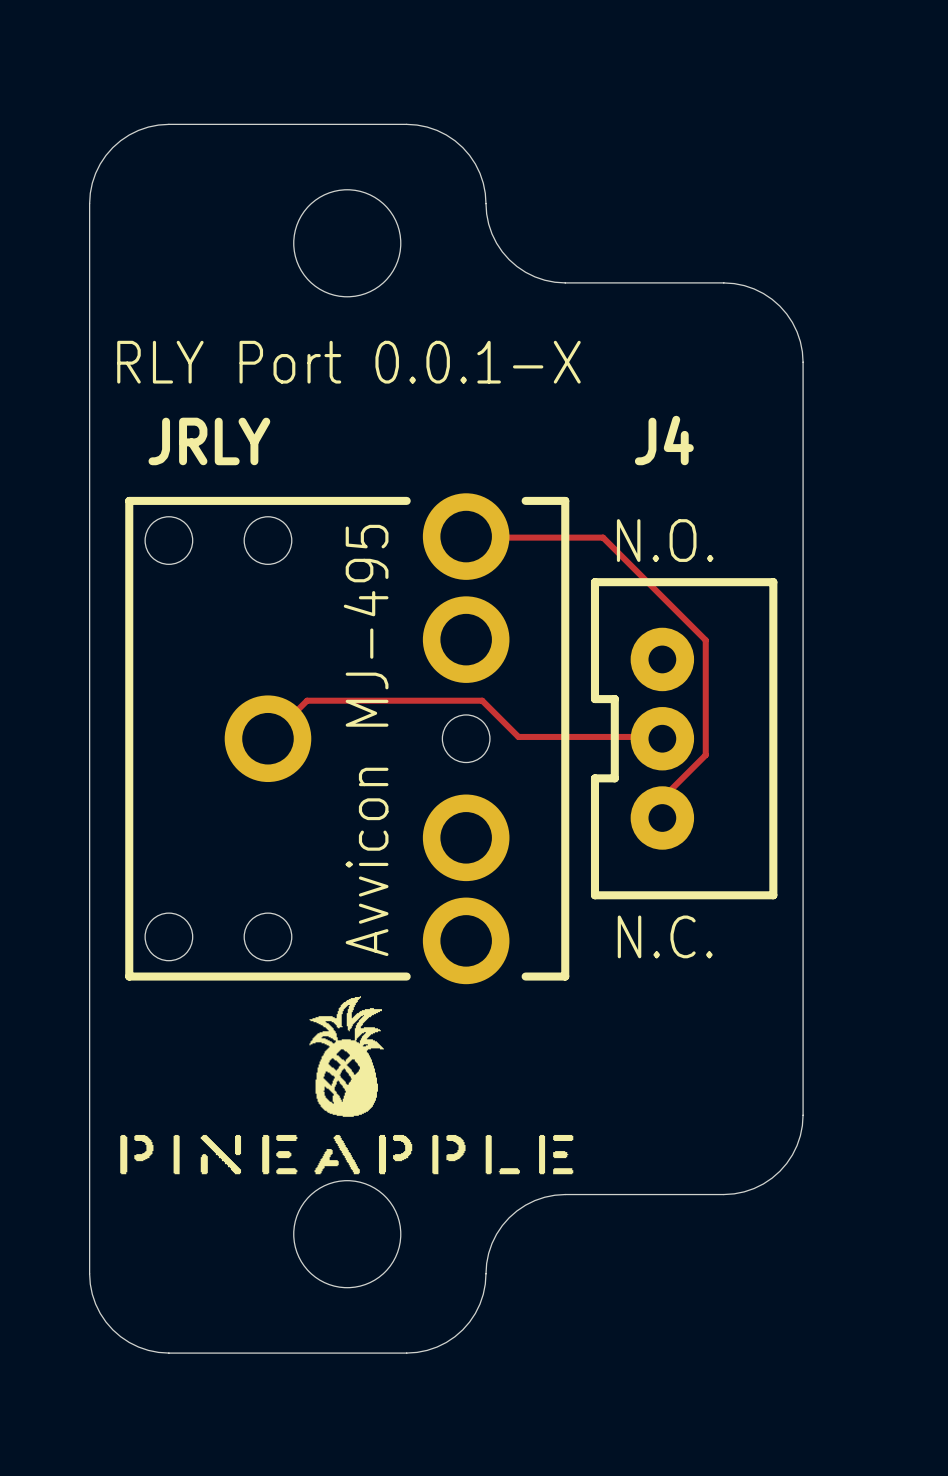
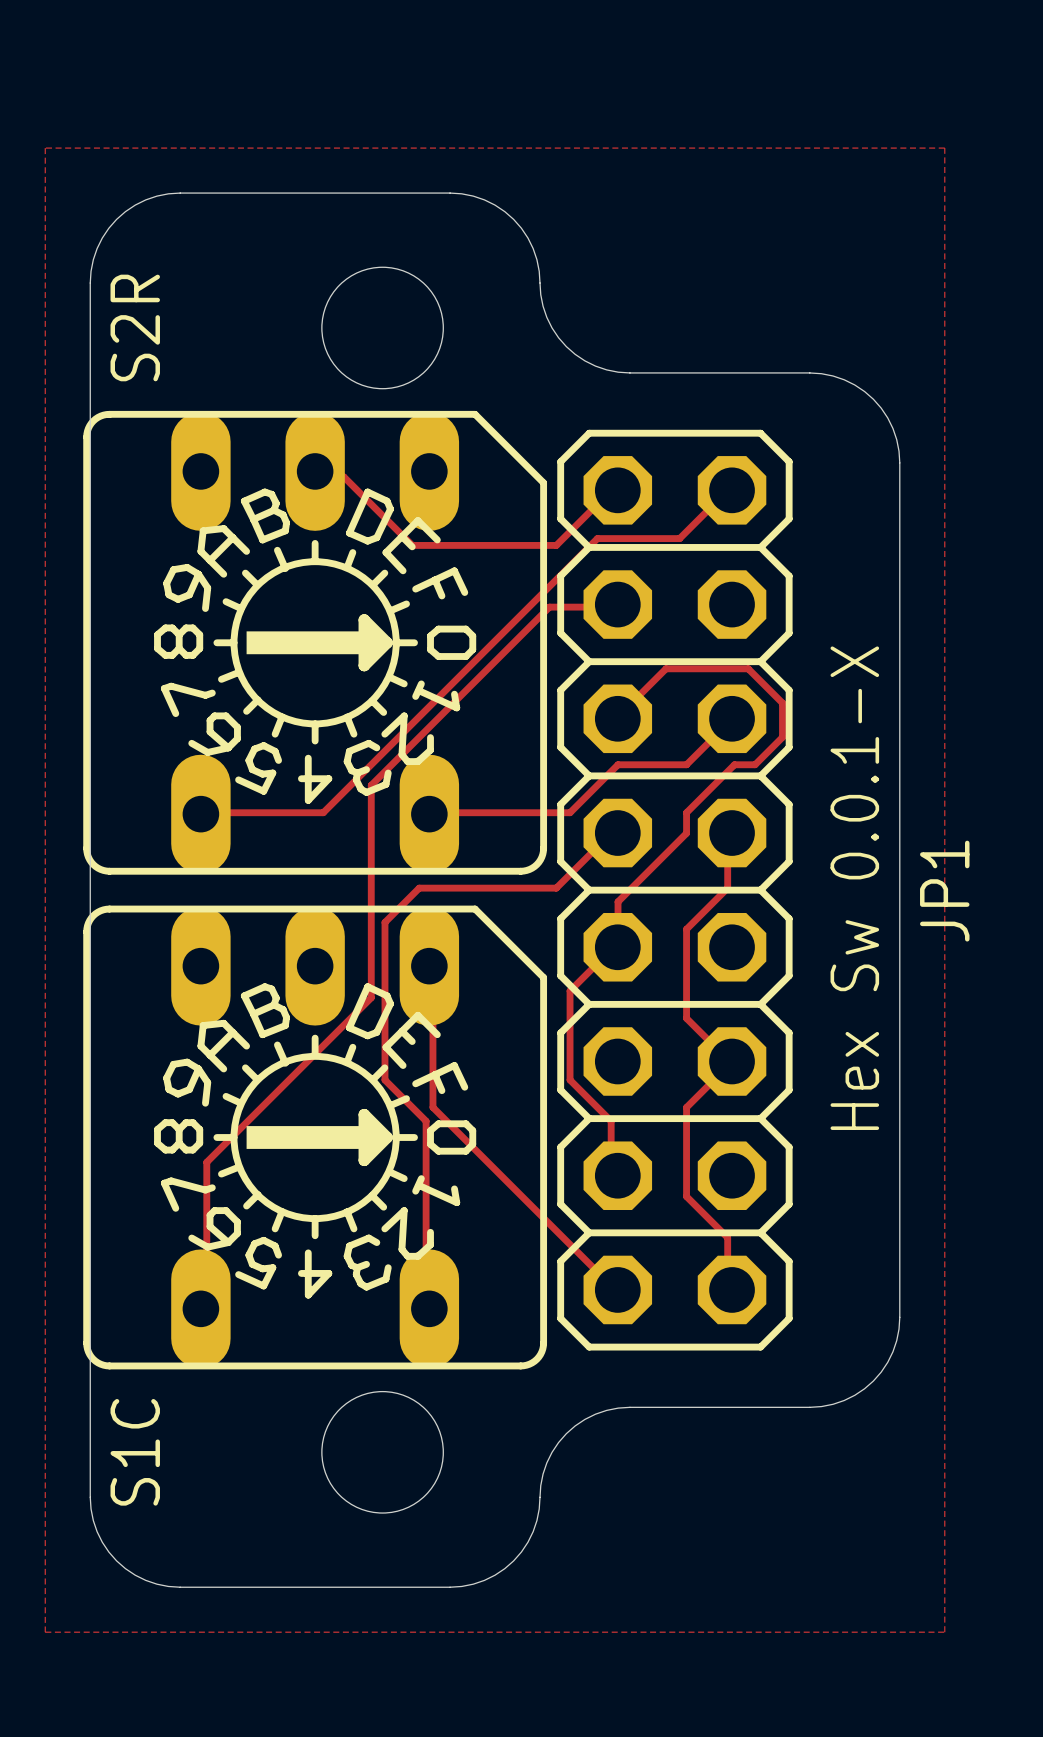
zone outline: none -> (45, 148) (944, 148) (944, 1632) (45, 1632) (45, 148)
text: RLY Port 0.0.1-X (348, 362) -> none
track: none -> (315, 471) (316, 476) (343, 476) (412, 545) (556, 545) (611, 490) (617, 490)
track: none -> (732, 490) (727, 490) (679, 538) (597, 538) (323, 812) (200, 814)
track: none -> (617, 604) (611, 607) (549, 607) (371, 785) (371, 997) (206, 1162) (206, 1306) (200, 1308)
S2R: none -> (315, 642)
track: (466, 536) (603, 537) (705, 640) (705, 755) (663, 797) (662, 818) -> none
text: N.O. (665, 540) -> none
track: none -> (617, 718) (666, 668) (748, 668) (782, 703) (782, 737) (755, 764) (734, 764) (686, 812) (686, 833) (618, 901) (617, 947) (611, 949) (570, 990) (570, 1080) (611, 1121) (611, 1169) (617, 1175)
track: none -> (732, 718) (686, 764) (618, 764) (570, 812) (429, 814)
track: none -> (617, 833) (611, 833) (556, 888) (419, 888) (384, 922) (384, 1080) (426, 1121) (426, 1306) (429, 1308)
track: none -> (732, 833) (727, 833) (727, 888) (686, 929) (686, 1018) (727, 1059) (732, 1061) (686, 1107) (686, 1196) (727, 1237) (727, 1285) (732, 1289)
text: none -> Hex Sw 0.0.1-X (854, 888)
track: (267, 738) (307, 700) (482, 700) (518, 736) (657, 736) (662, 738) -> none
JRLY: (347, 738) -> none
JP1: none -> (674, 890)
J4: (684, 738) -> none
text: Avvicon MJ-495 (366, 740) -> none
track: none -> (429, 966) (432, 970) (432, 1107) (611, 1285) (617, 1289)
text: N.C. (665, 936) -> none
S1C: none -> (315, 1137)
drawing: [120, 996, 574, 1175] -> none

